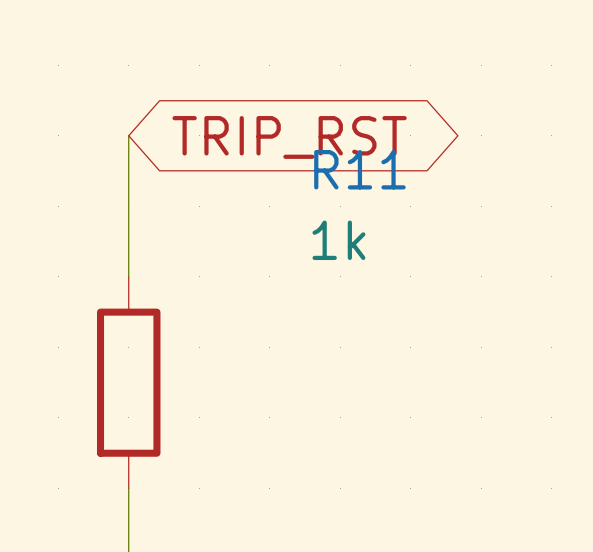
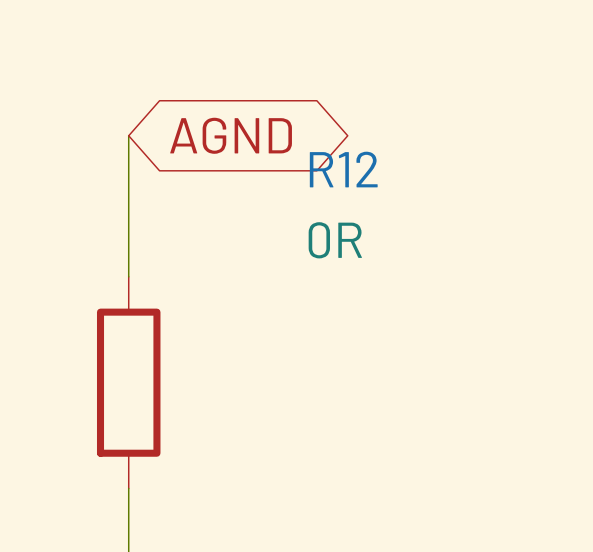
global label: TRIP_RST (289, 137) -> AGND (231, 135)
R11 name: R11 (359, 169) -> R12 (343, 169)
R11 value: 1k (338, 240) -> 0R (335, 240)

